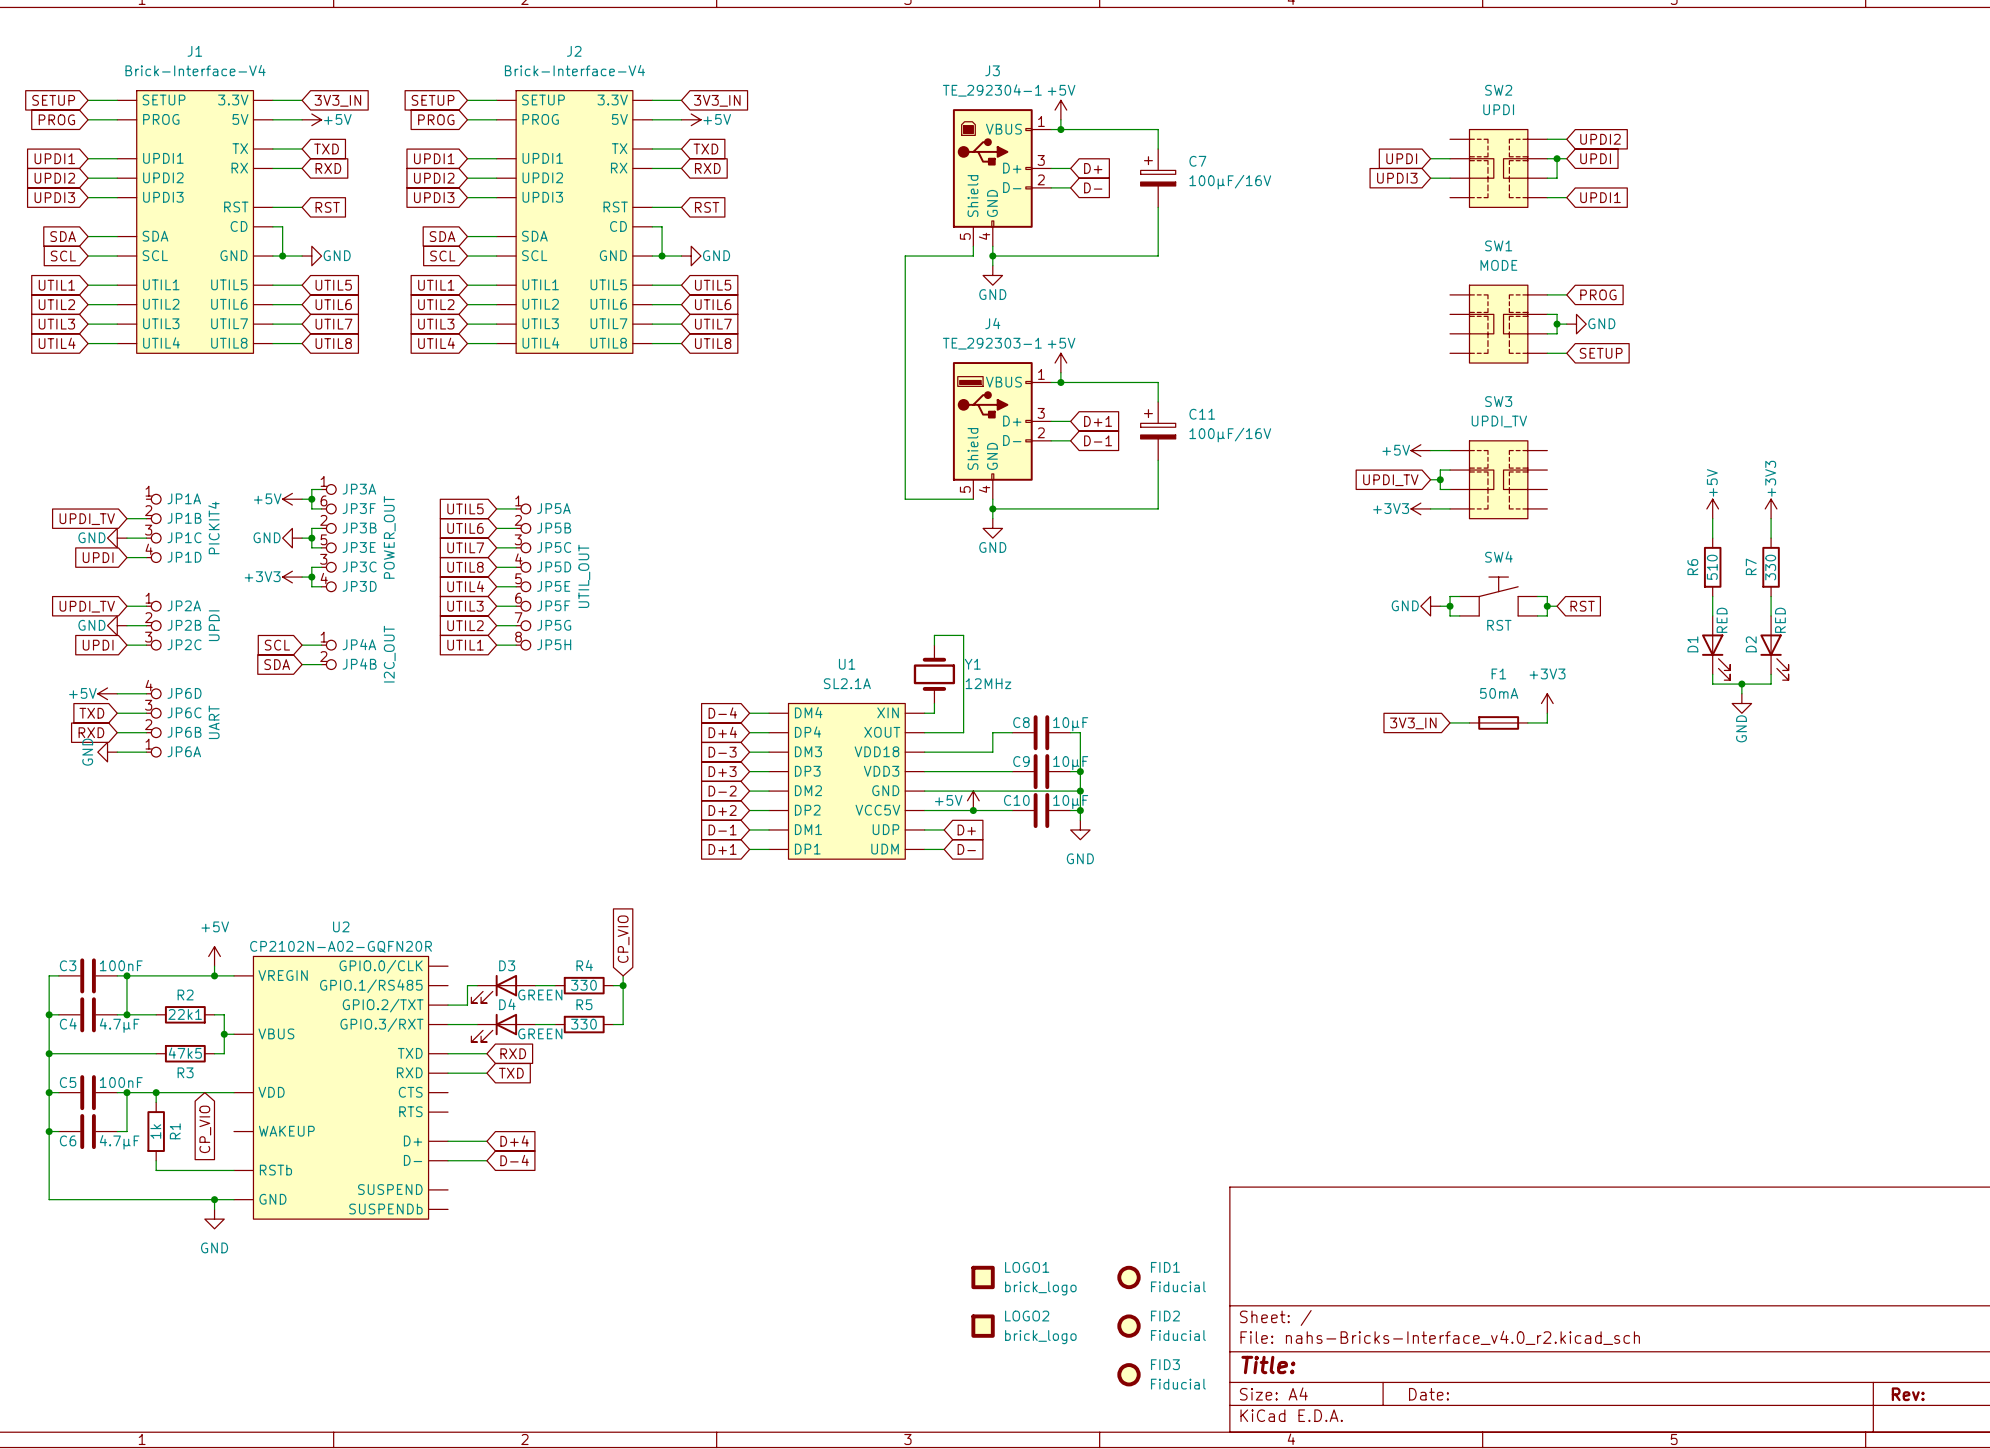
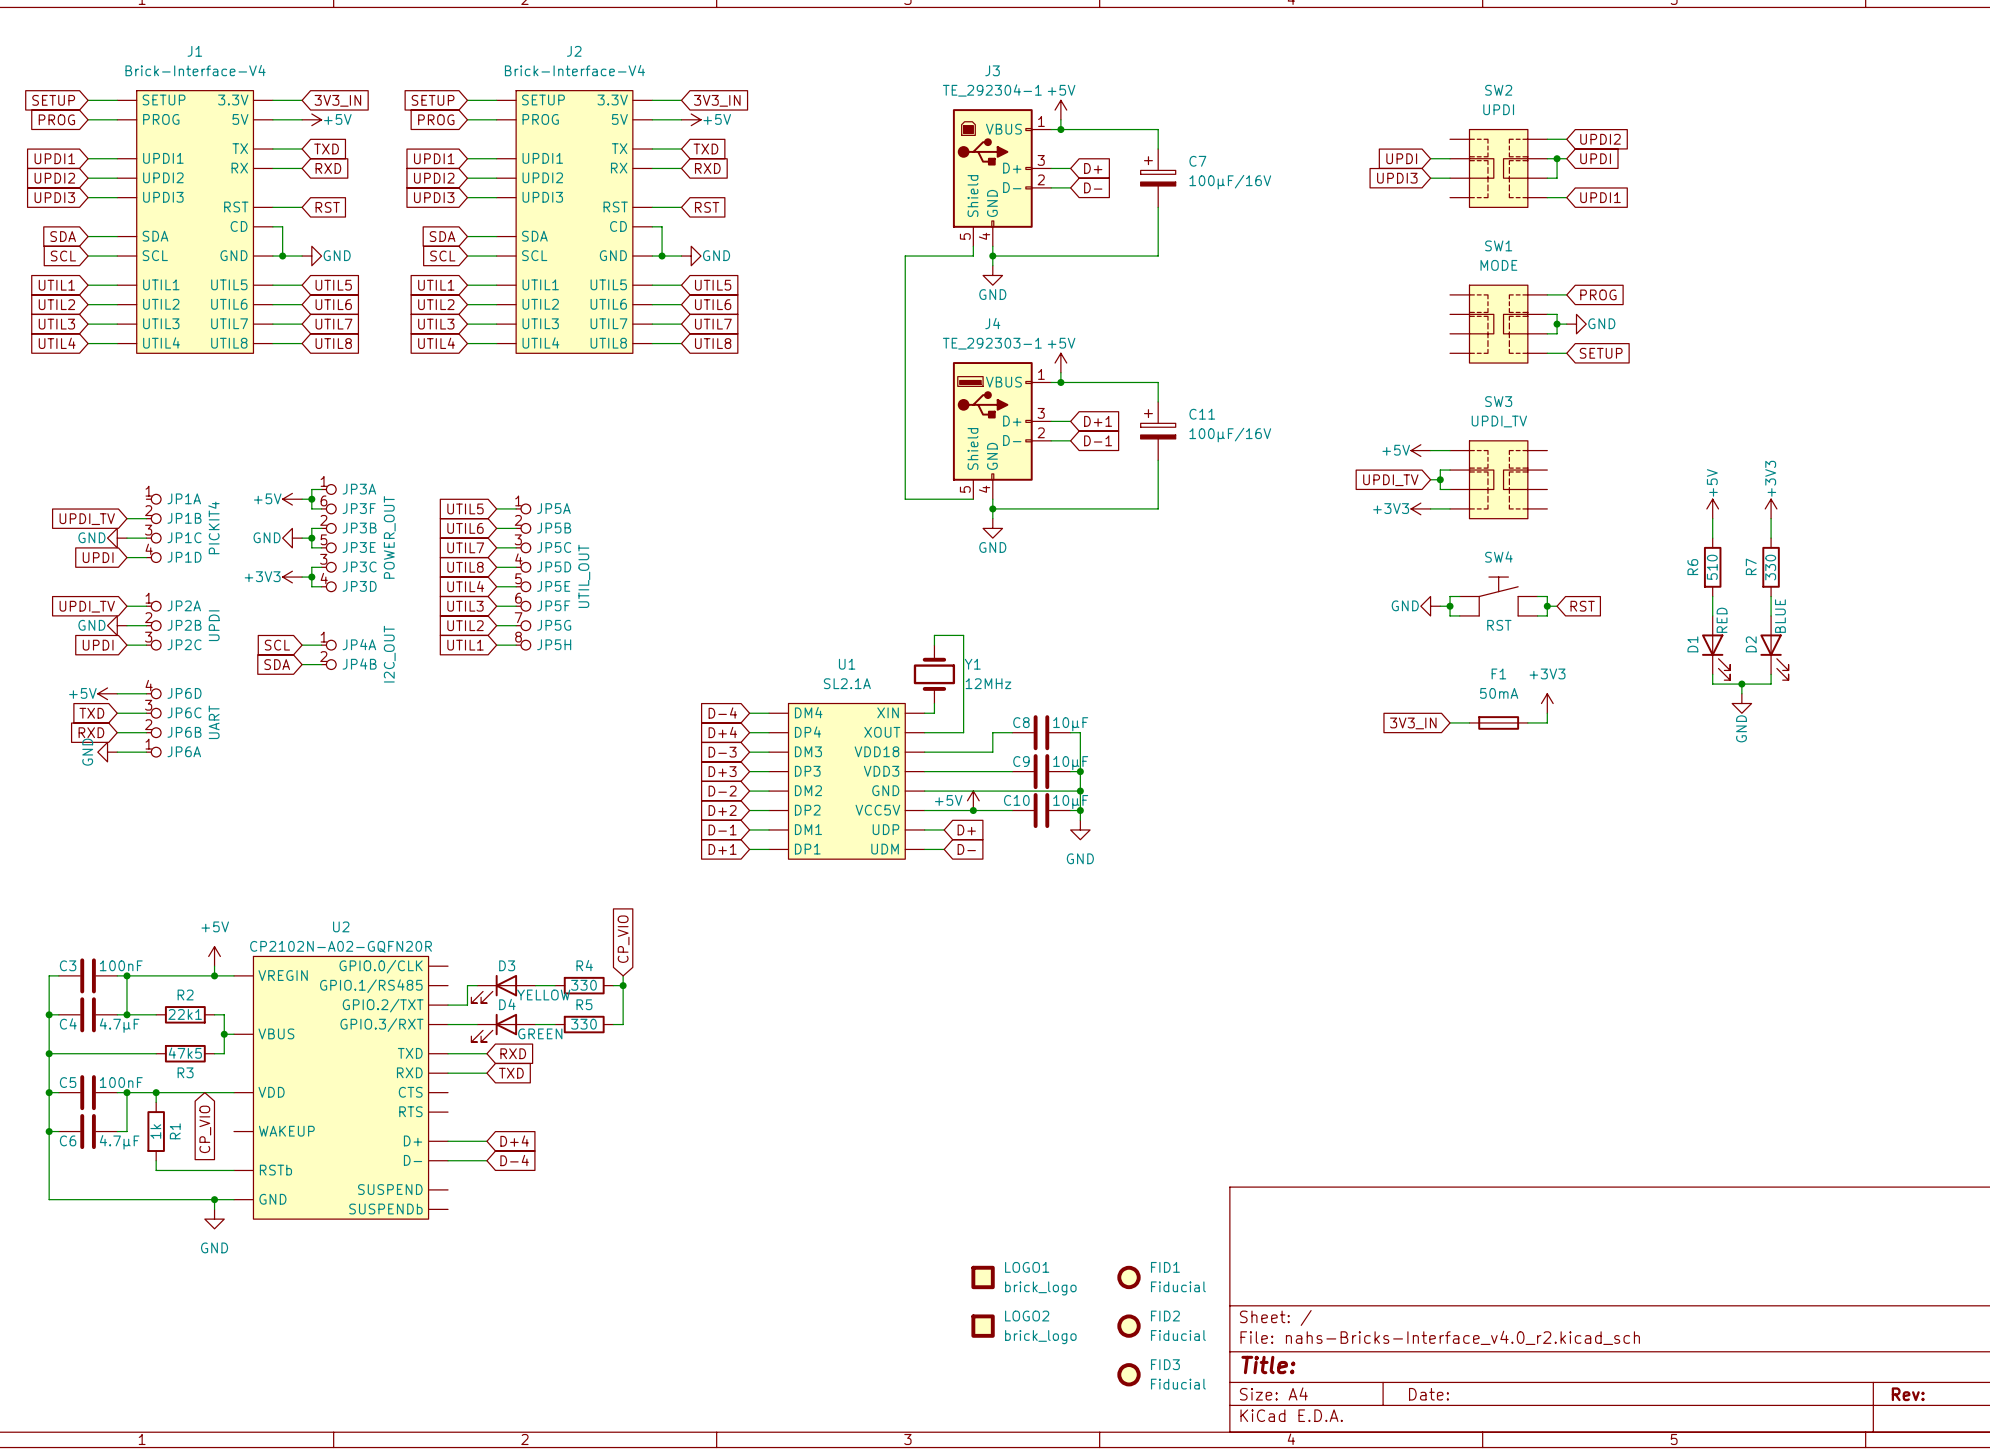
D2 value: RED (1780, 620) -> BLUE (1780, 616)
D3 value: GREEN (540, 994) -> YELLOW (543, 994)

